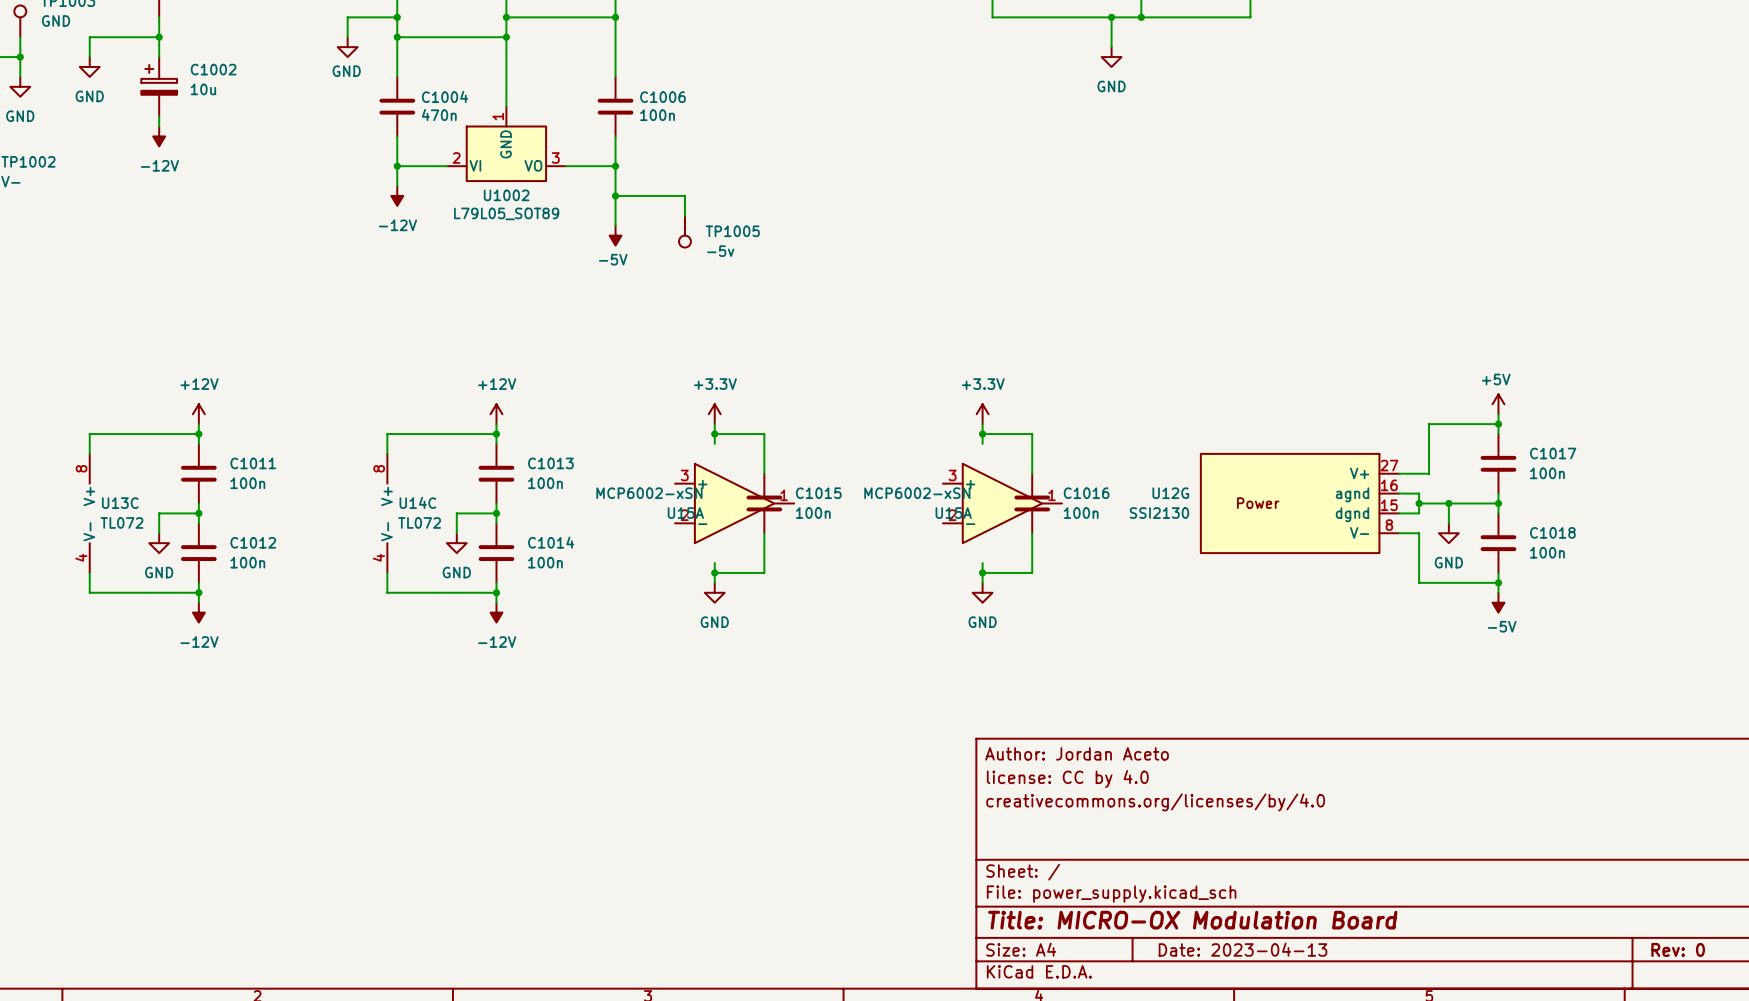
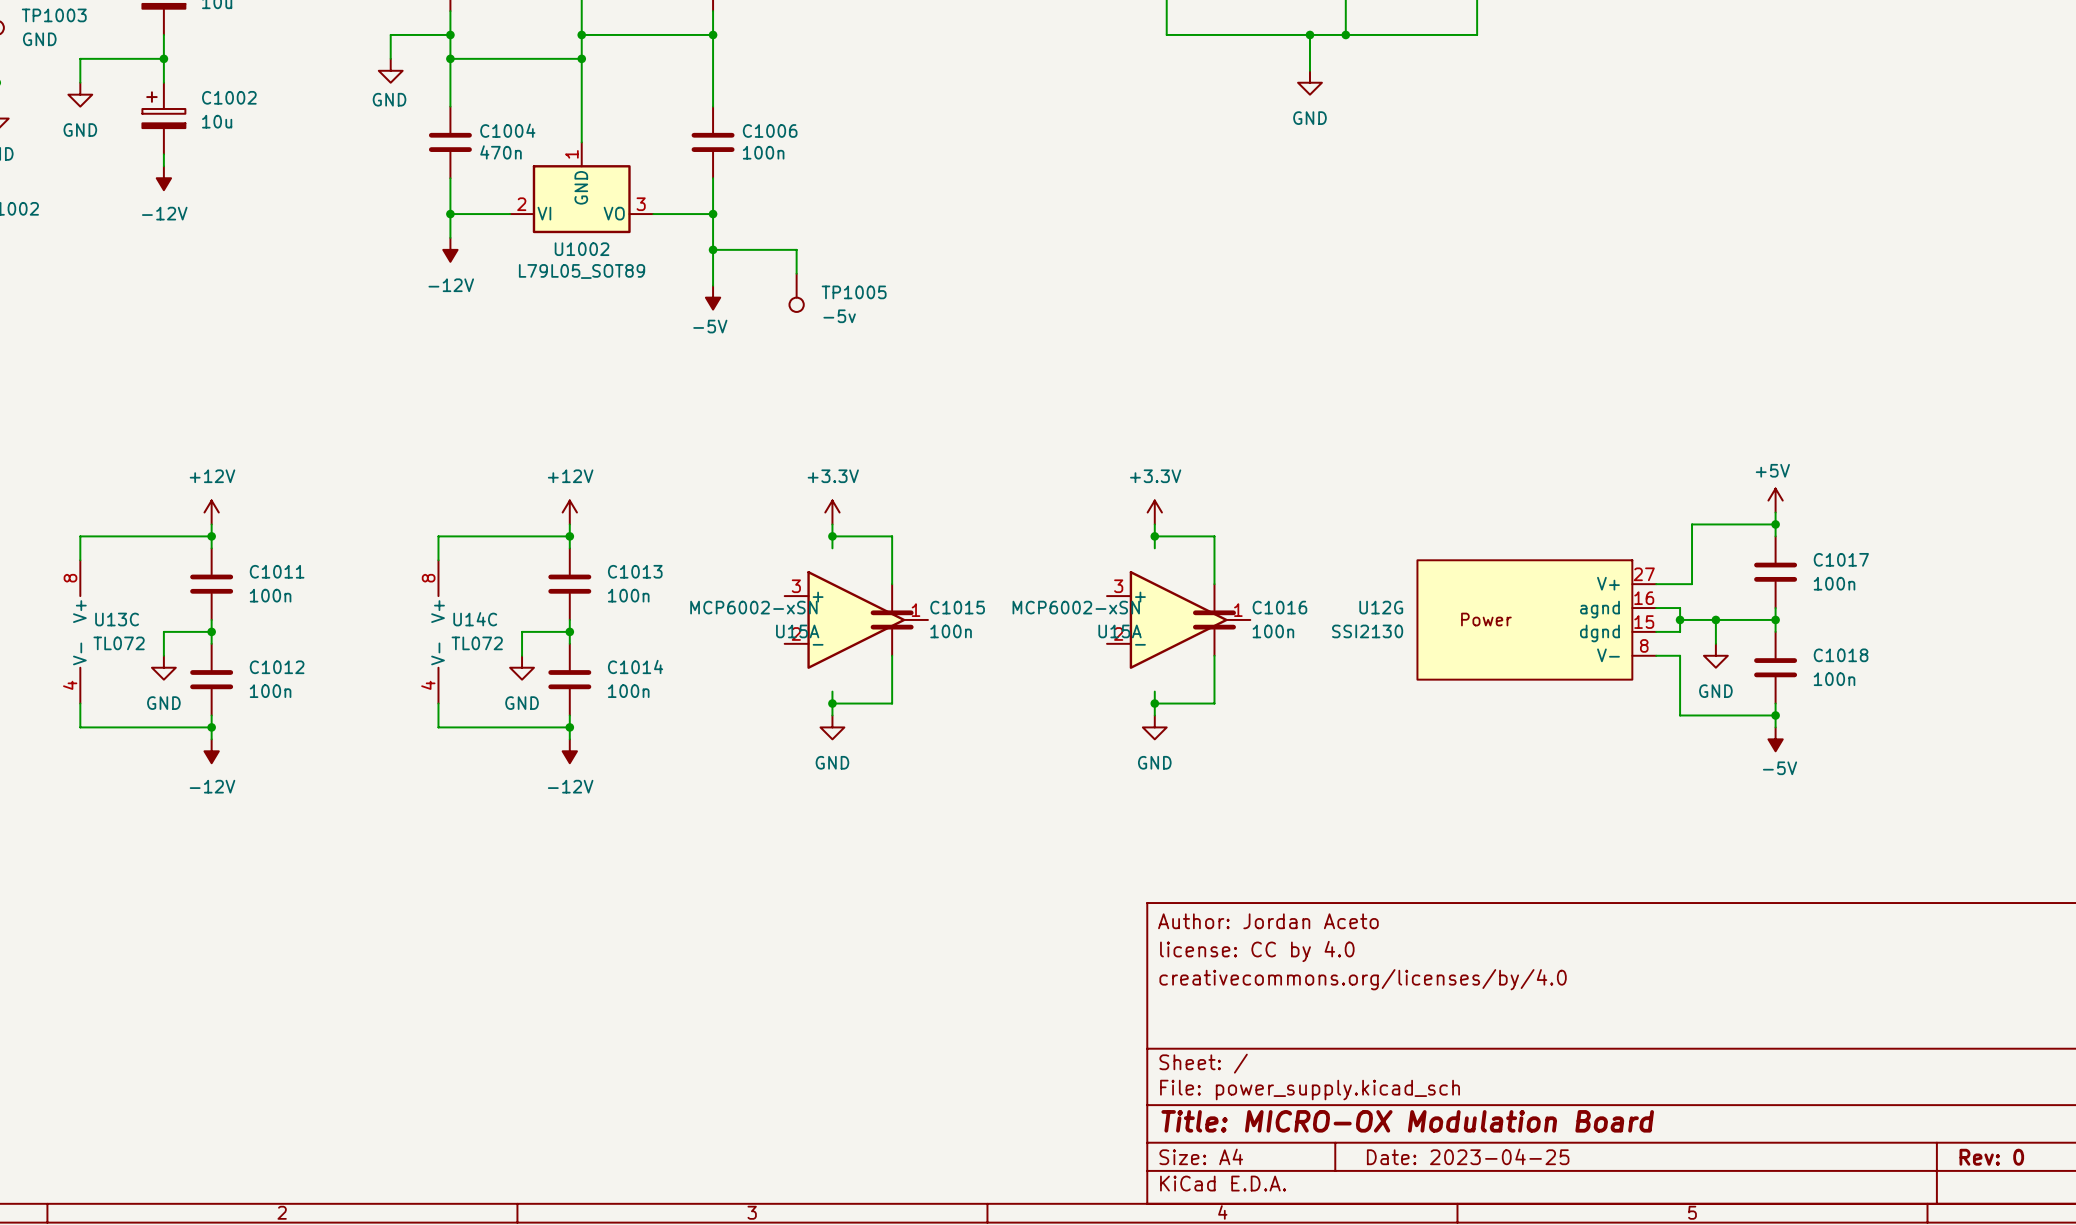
title block: Date: 2023-04-13 (1243, 949) -> Date: 2023-04-25 (1468, 1156)

